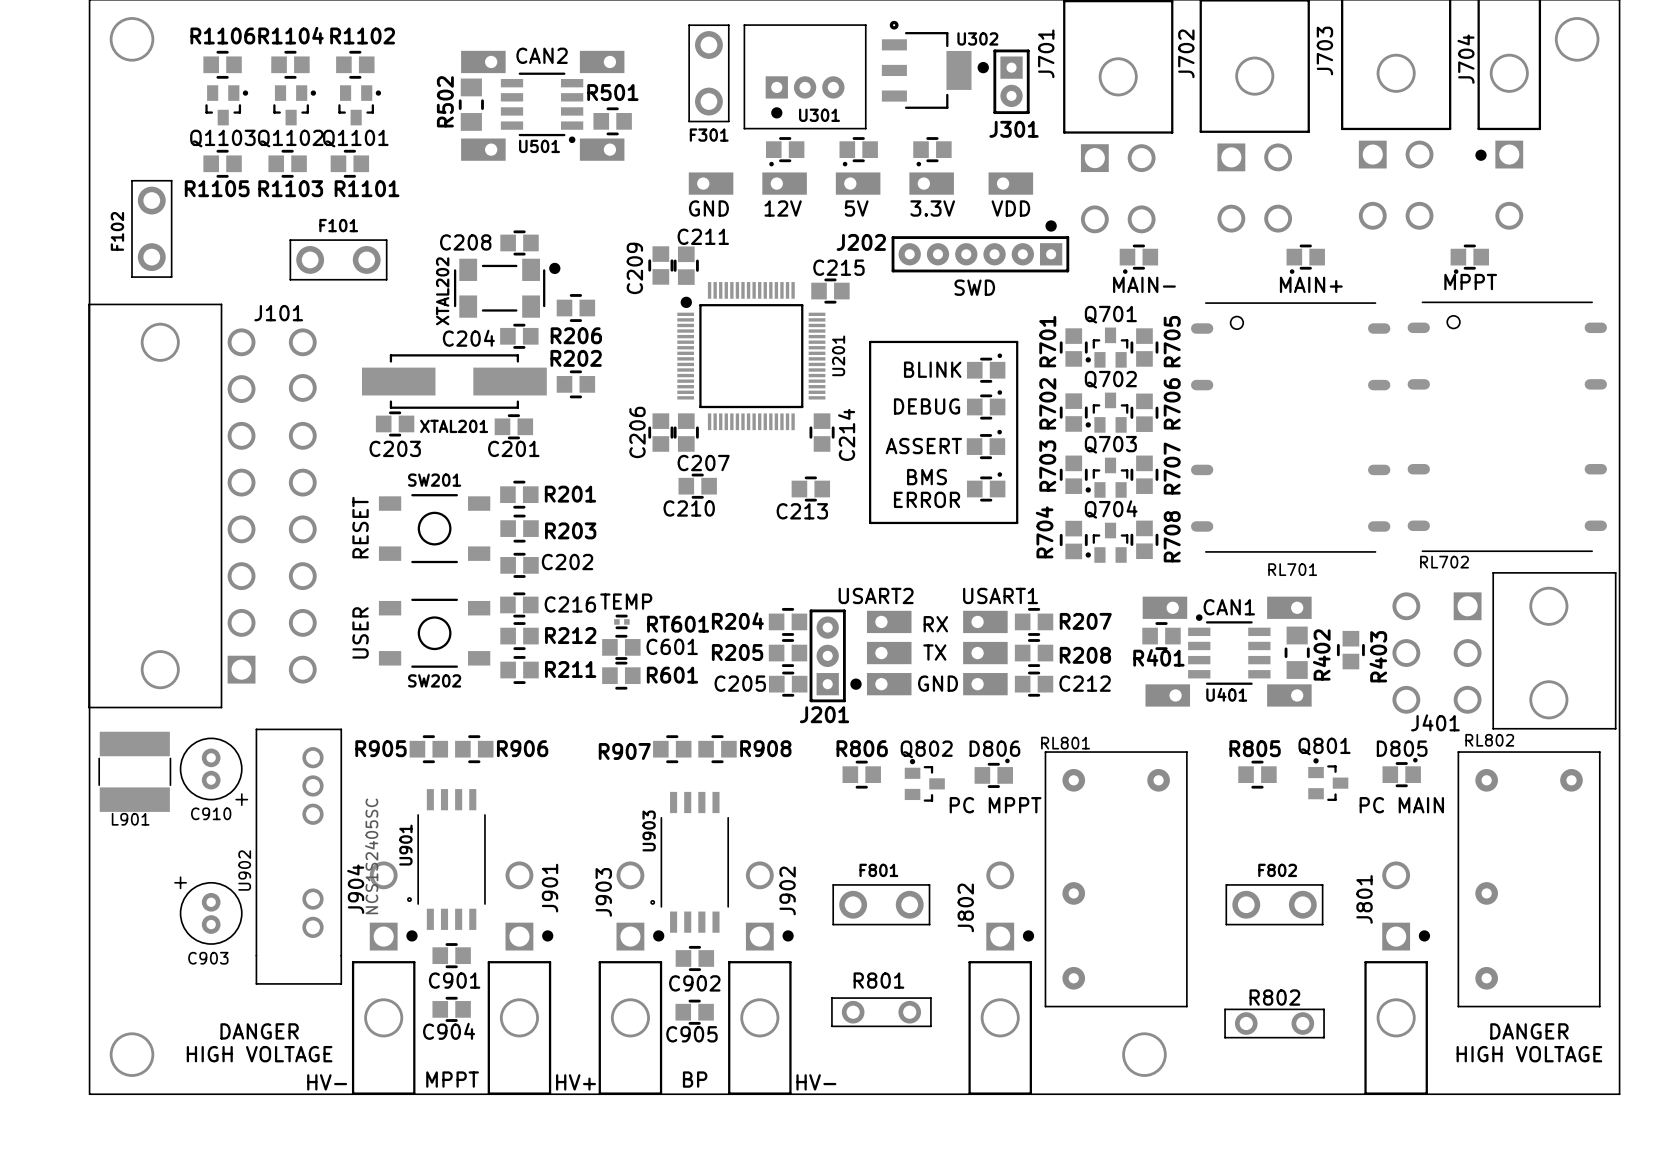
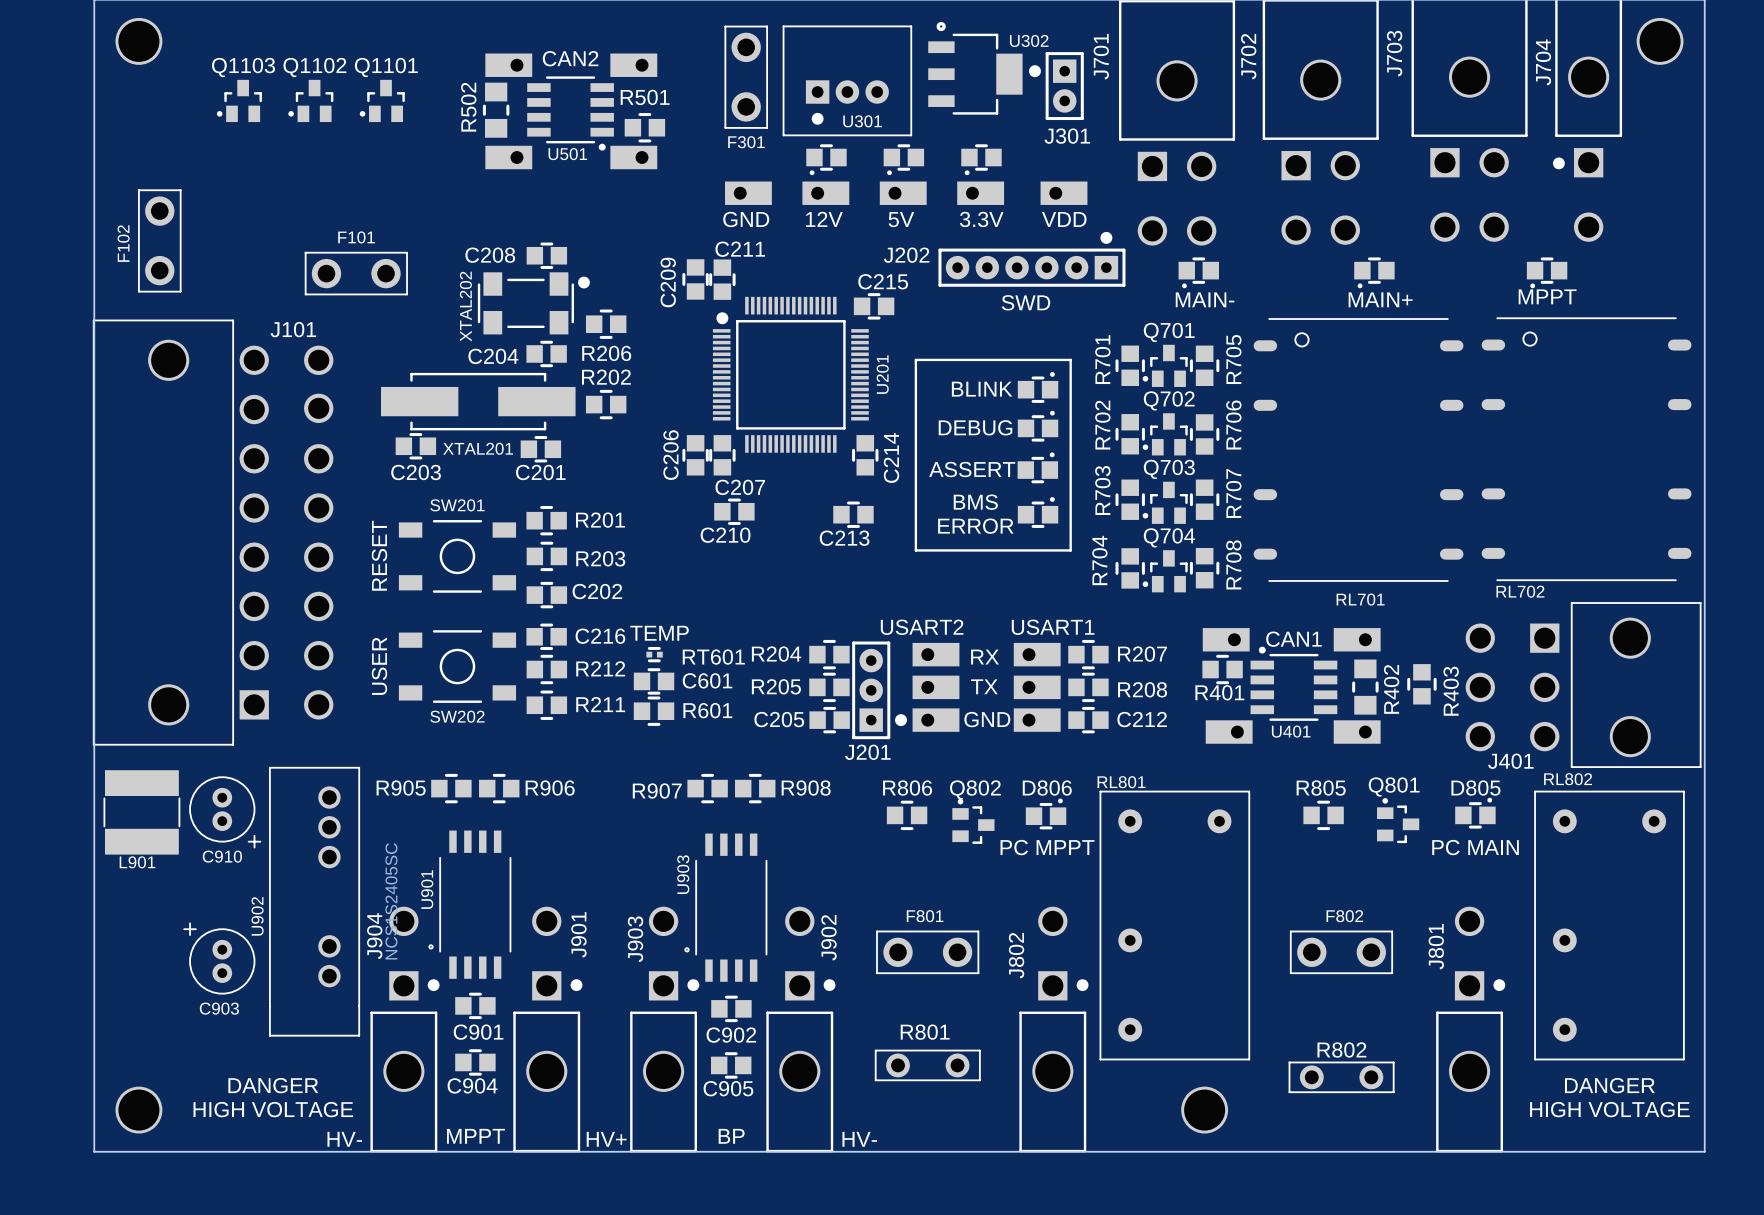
R1106: (222, 64) -> none
R1104: (290, 64) -> none
R1102: (355, 64) -> none
Q1103 rotation: 0° (226, 105) -> 180° (239, 100)
Q1102 rotation: 0° (294, 105) -> 180° (310, 100)
Q1101 rotation: 0° (359, 105) -> 180° (382, 100)
R1105: (222, 163) -> none
R1103: (287, 163) -> none
R1101: (349, 163) -> none

